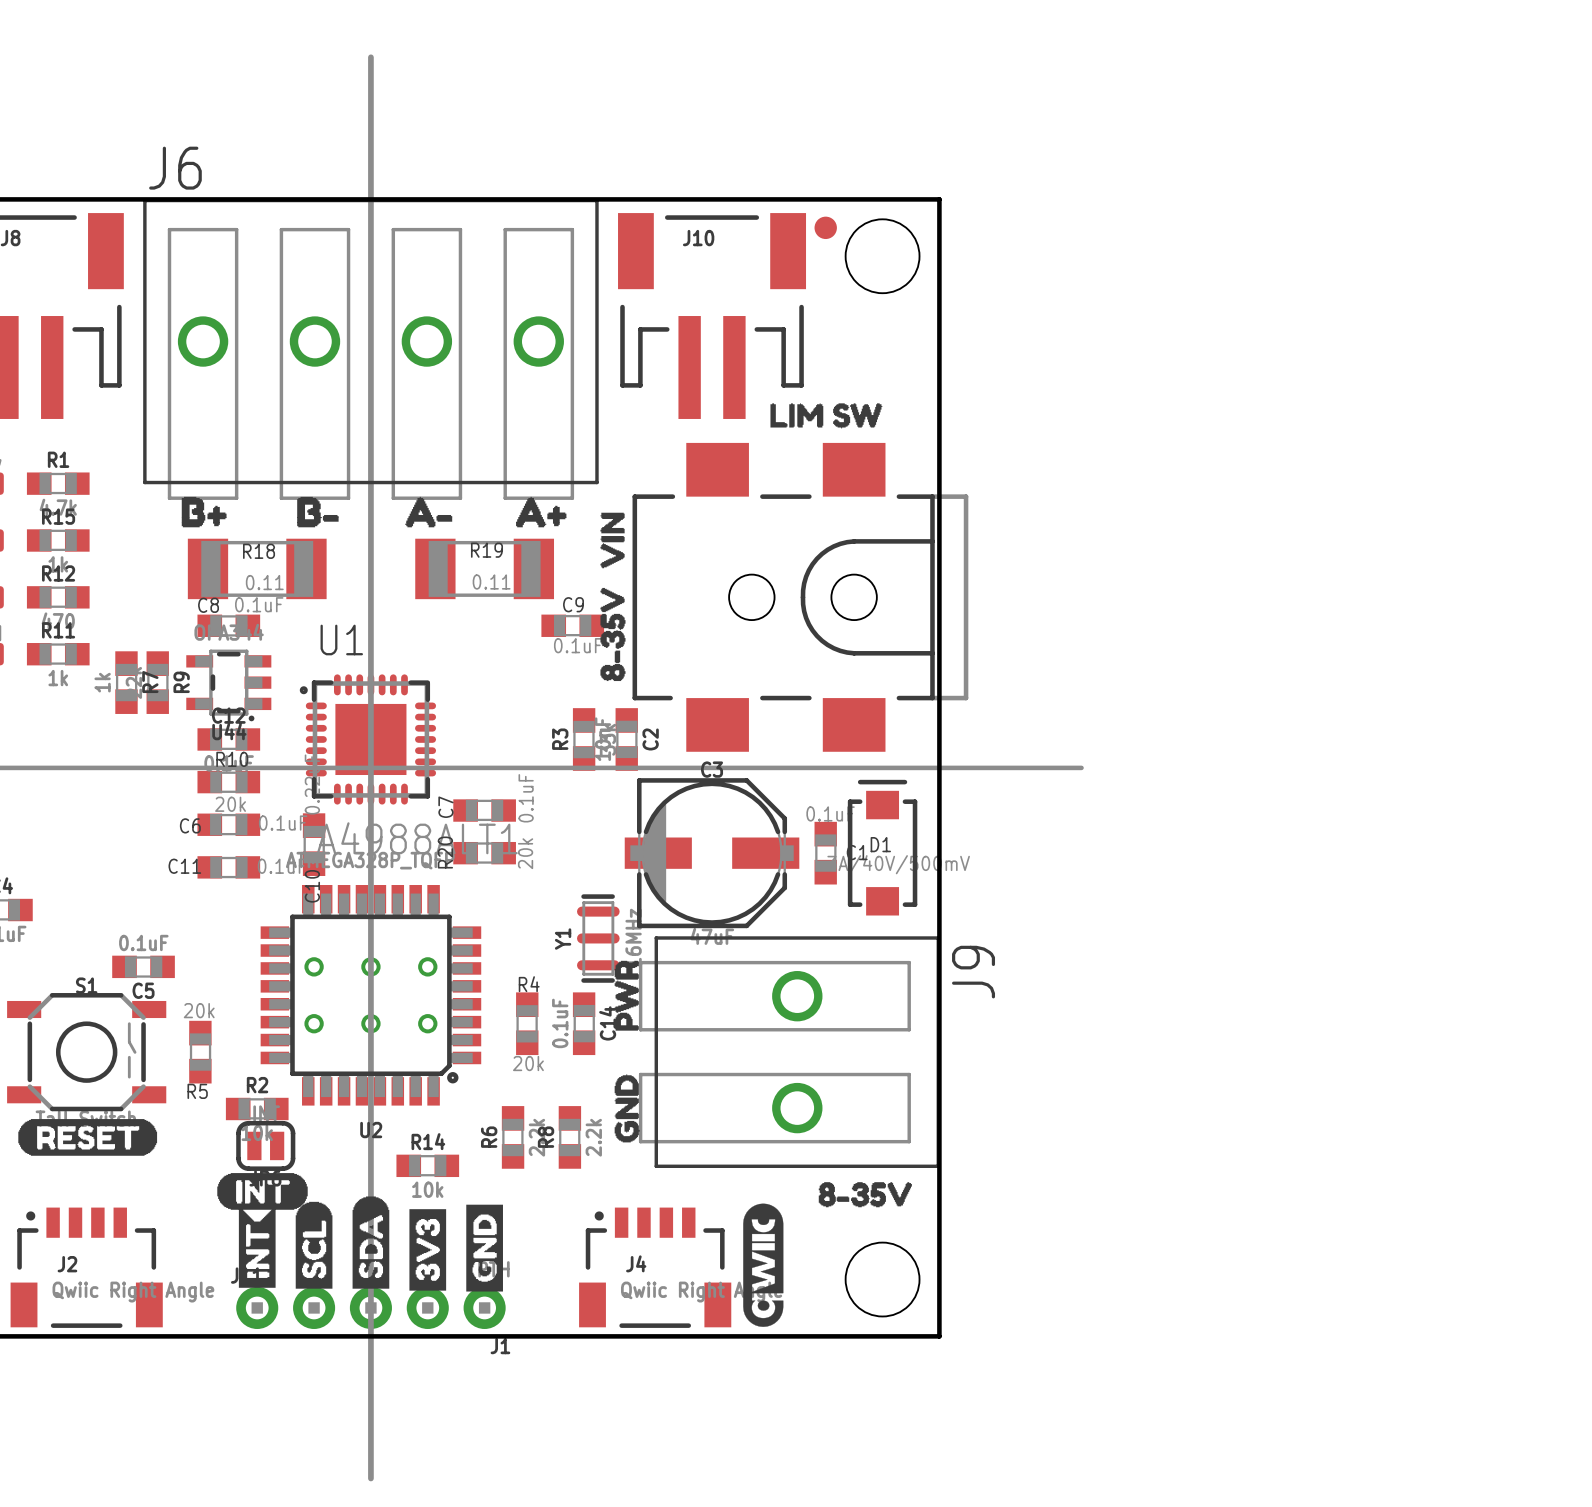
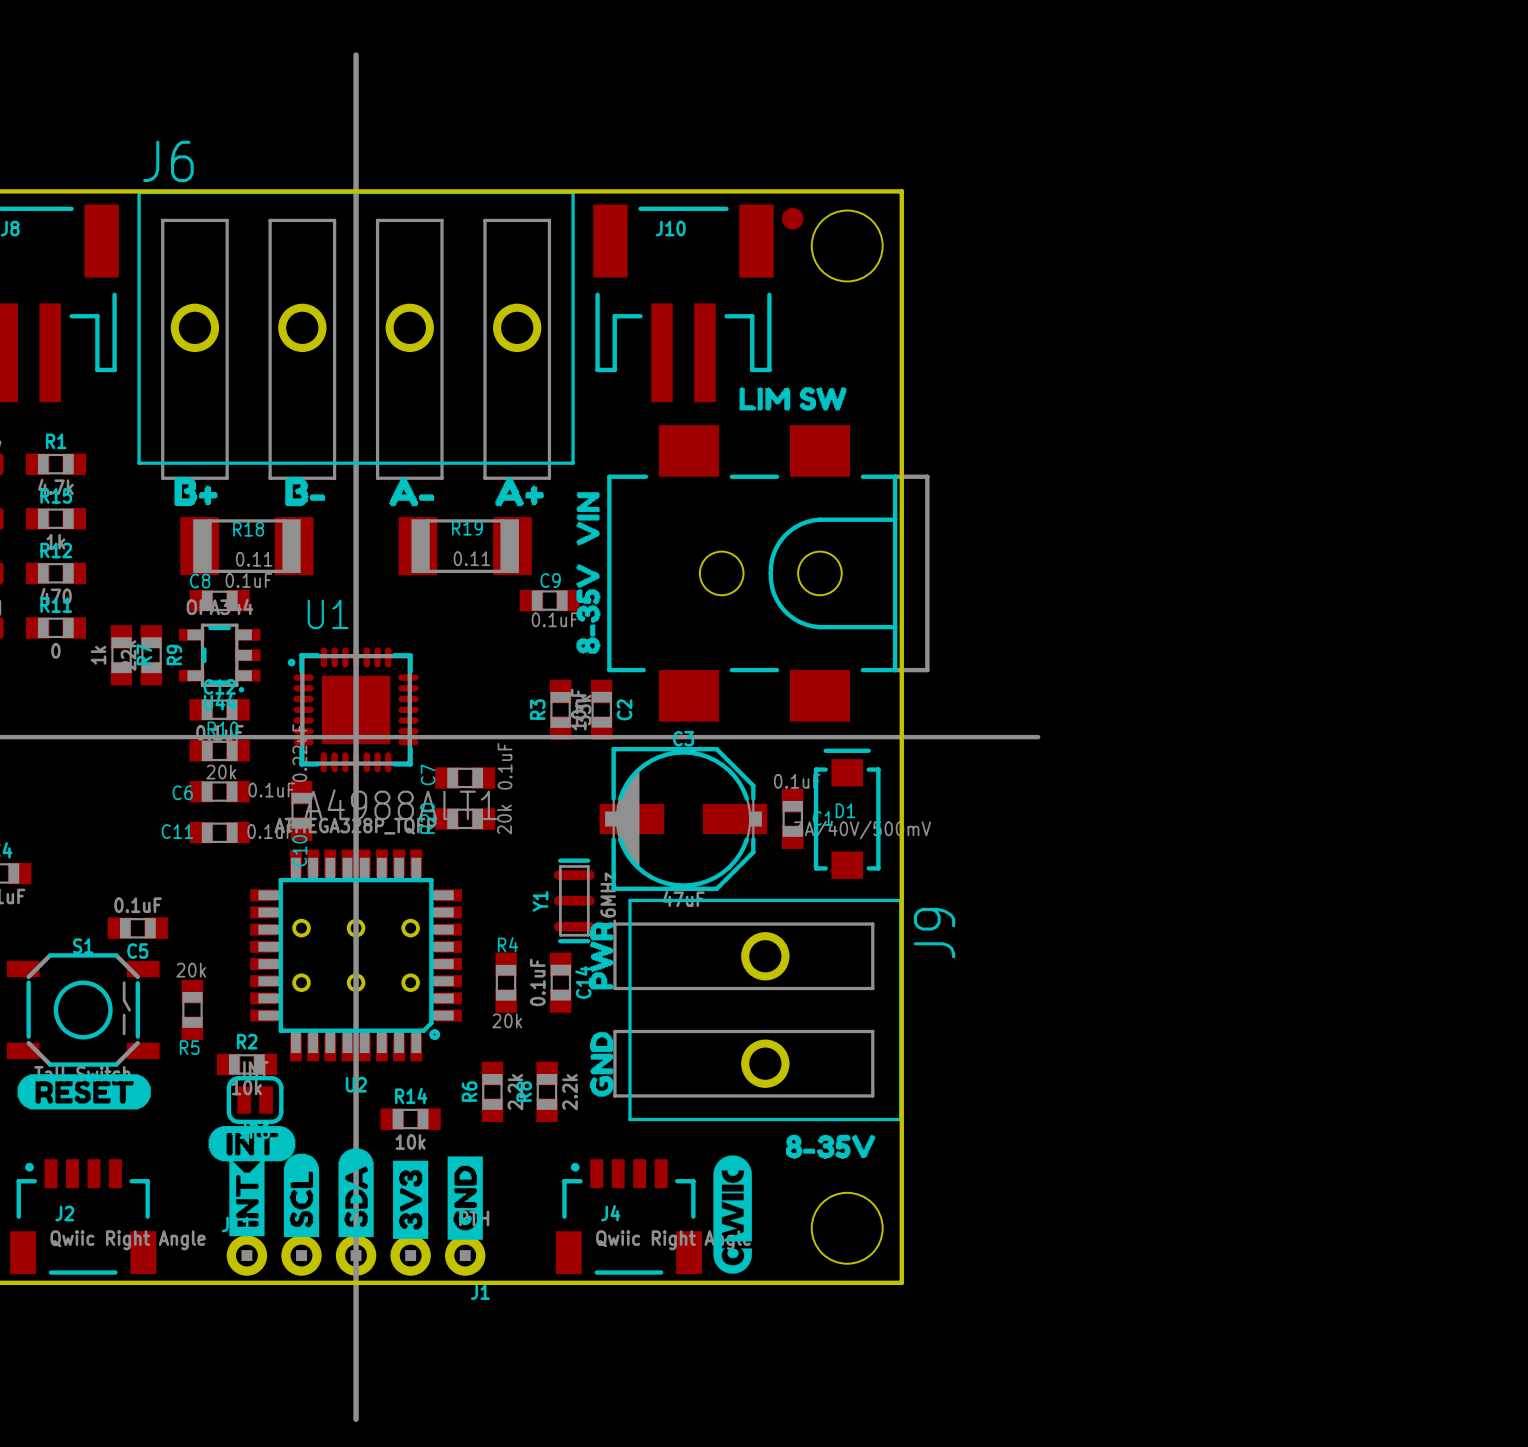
R11 value: 1k (58, 678) -> 0 (55, 650)

